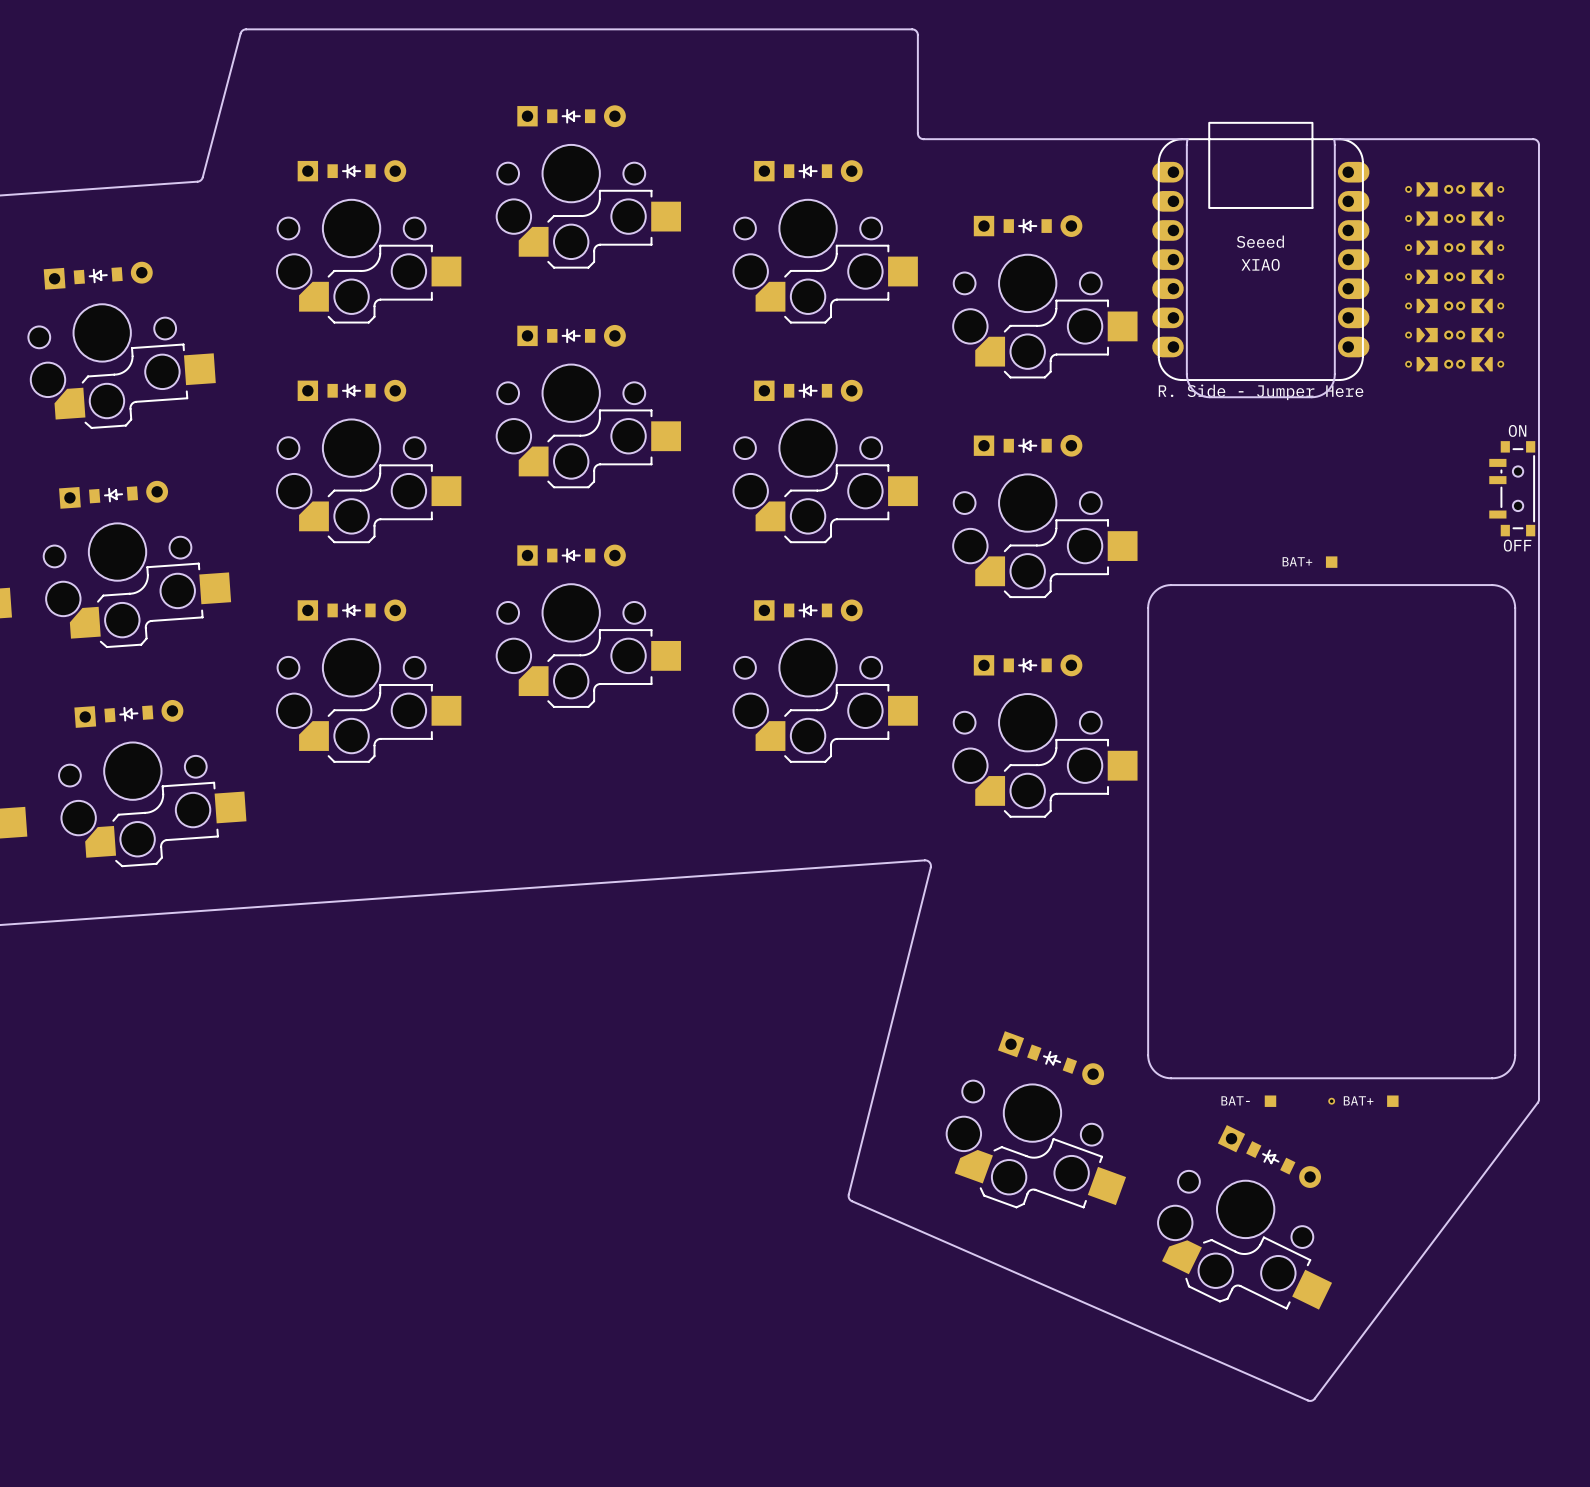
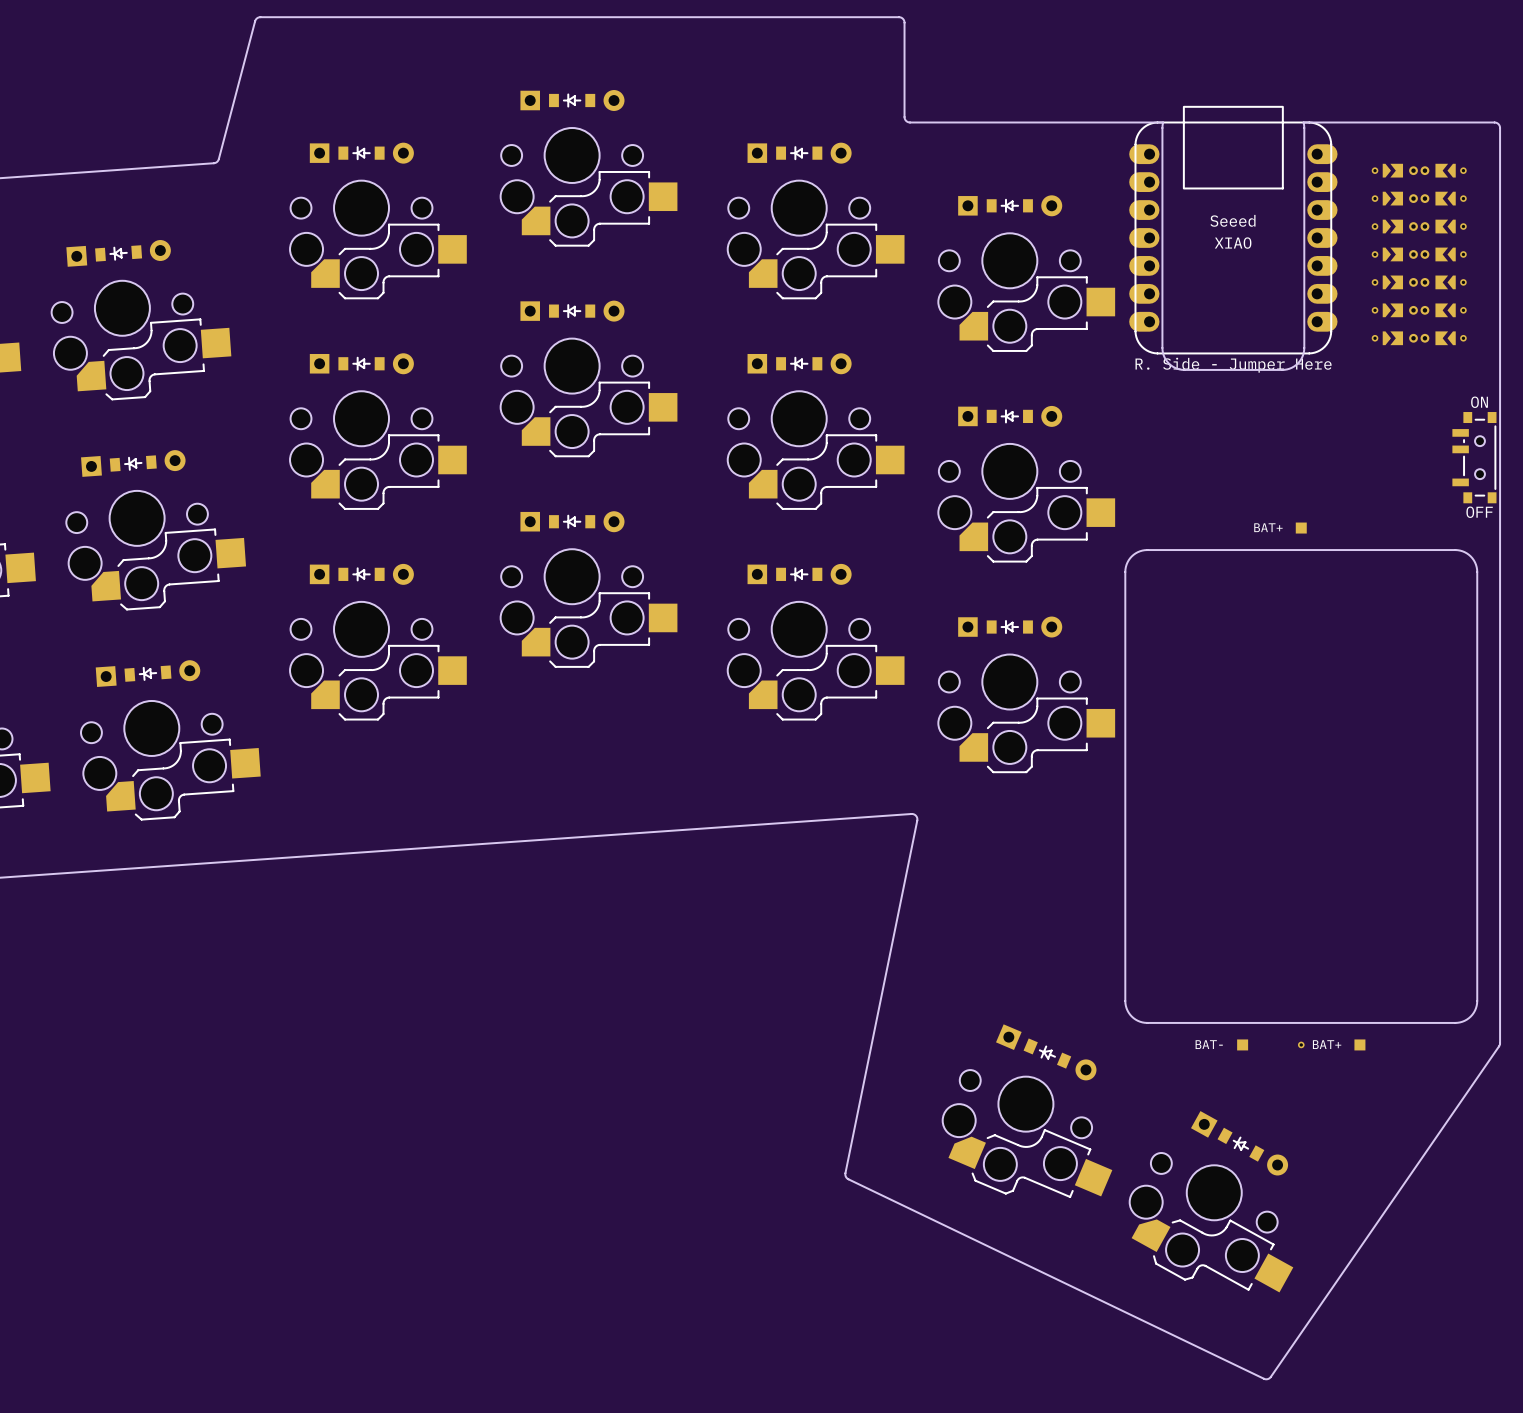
board edge: (924, 860) (929, 862) (930, 867) (848, 1194) (849, 1199) (1307, 1400) (1314, 1398) (1538, 1099) -> (911, 814) (916, 815) (917, 820) (845, 1173) (846, 1177) (1264, 1379) (1270, 1376) (1500, 1043)
part: (1051, 1058) -> none
part: none -> (1046, 1052)
part: (1036, 1144) -> none
part: (1269, 1156) -> none
part: none -> (1027, 1133)
part: none -> (1239, 1143)
part: (1245, 1240) -> none
part: none -> (1211, 1222)

